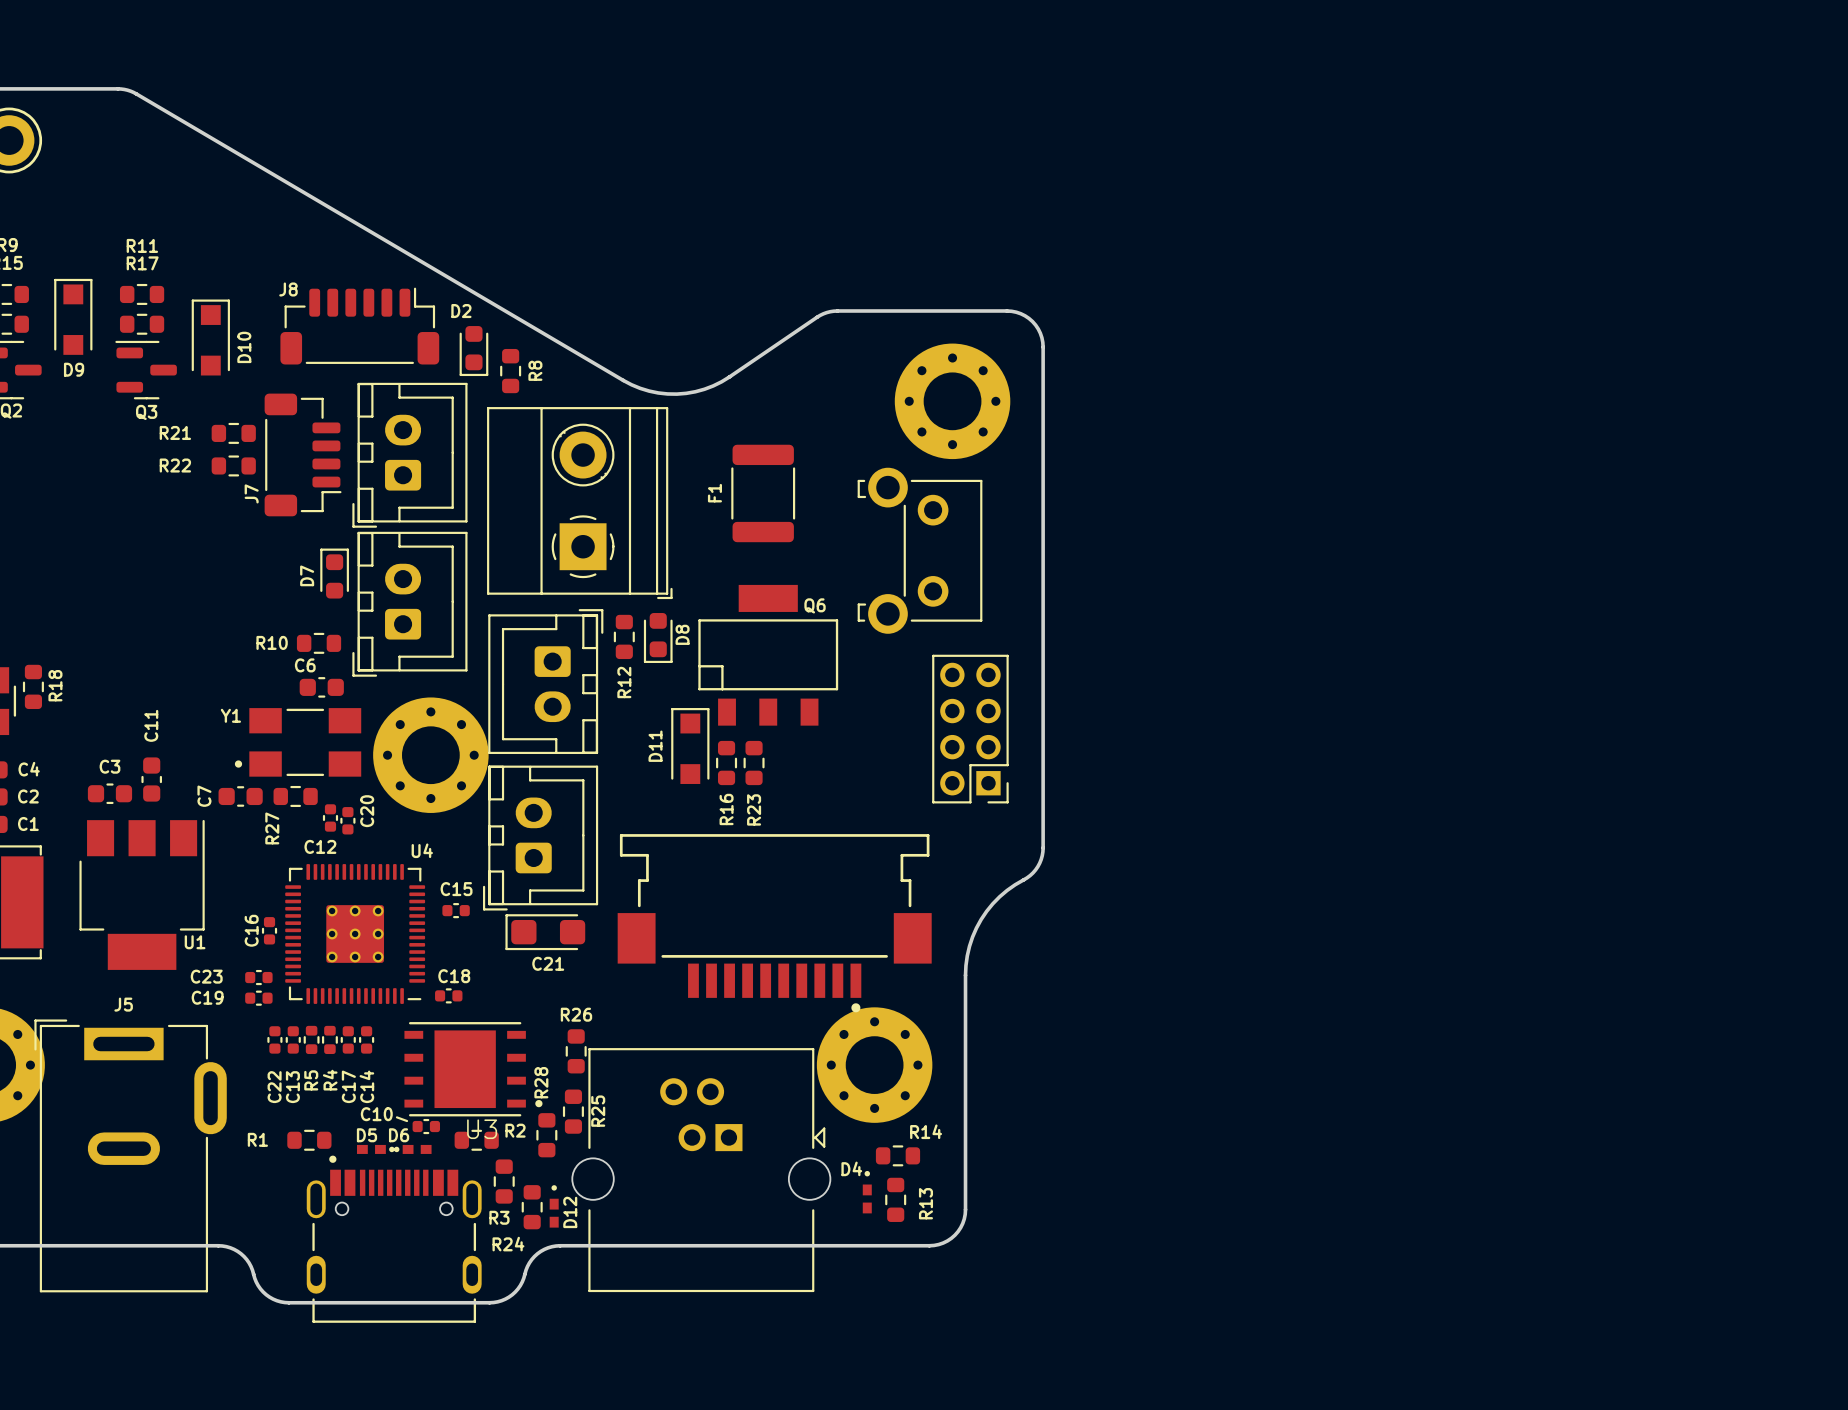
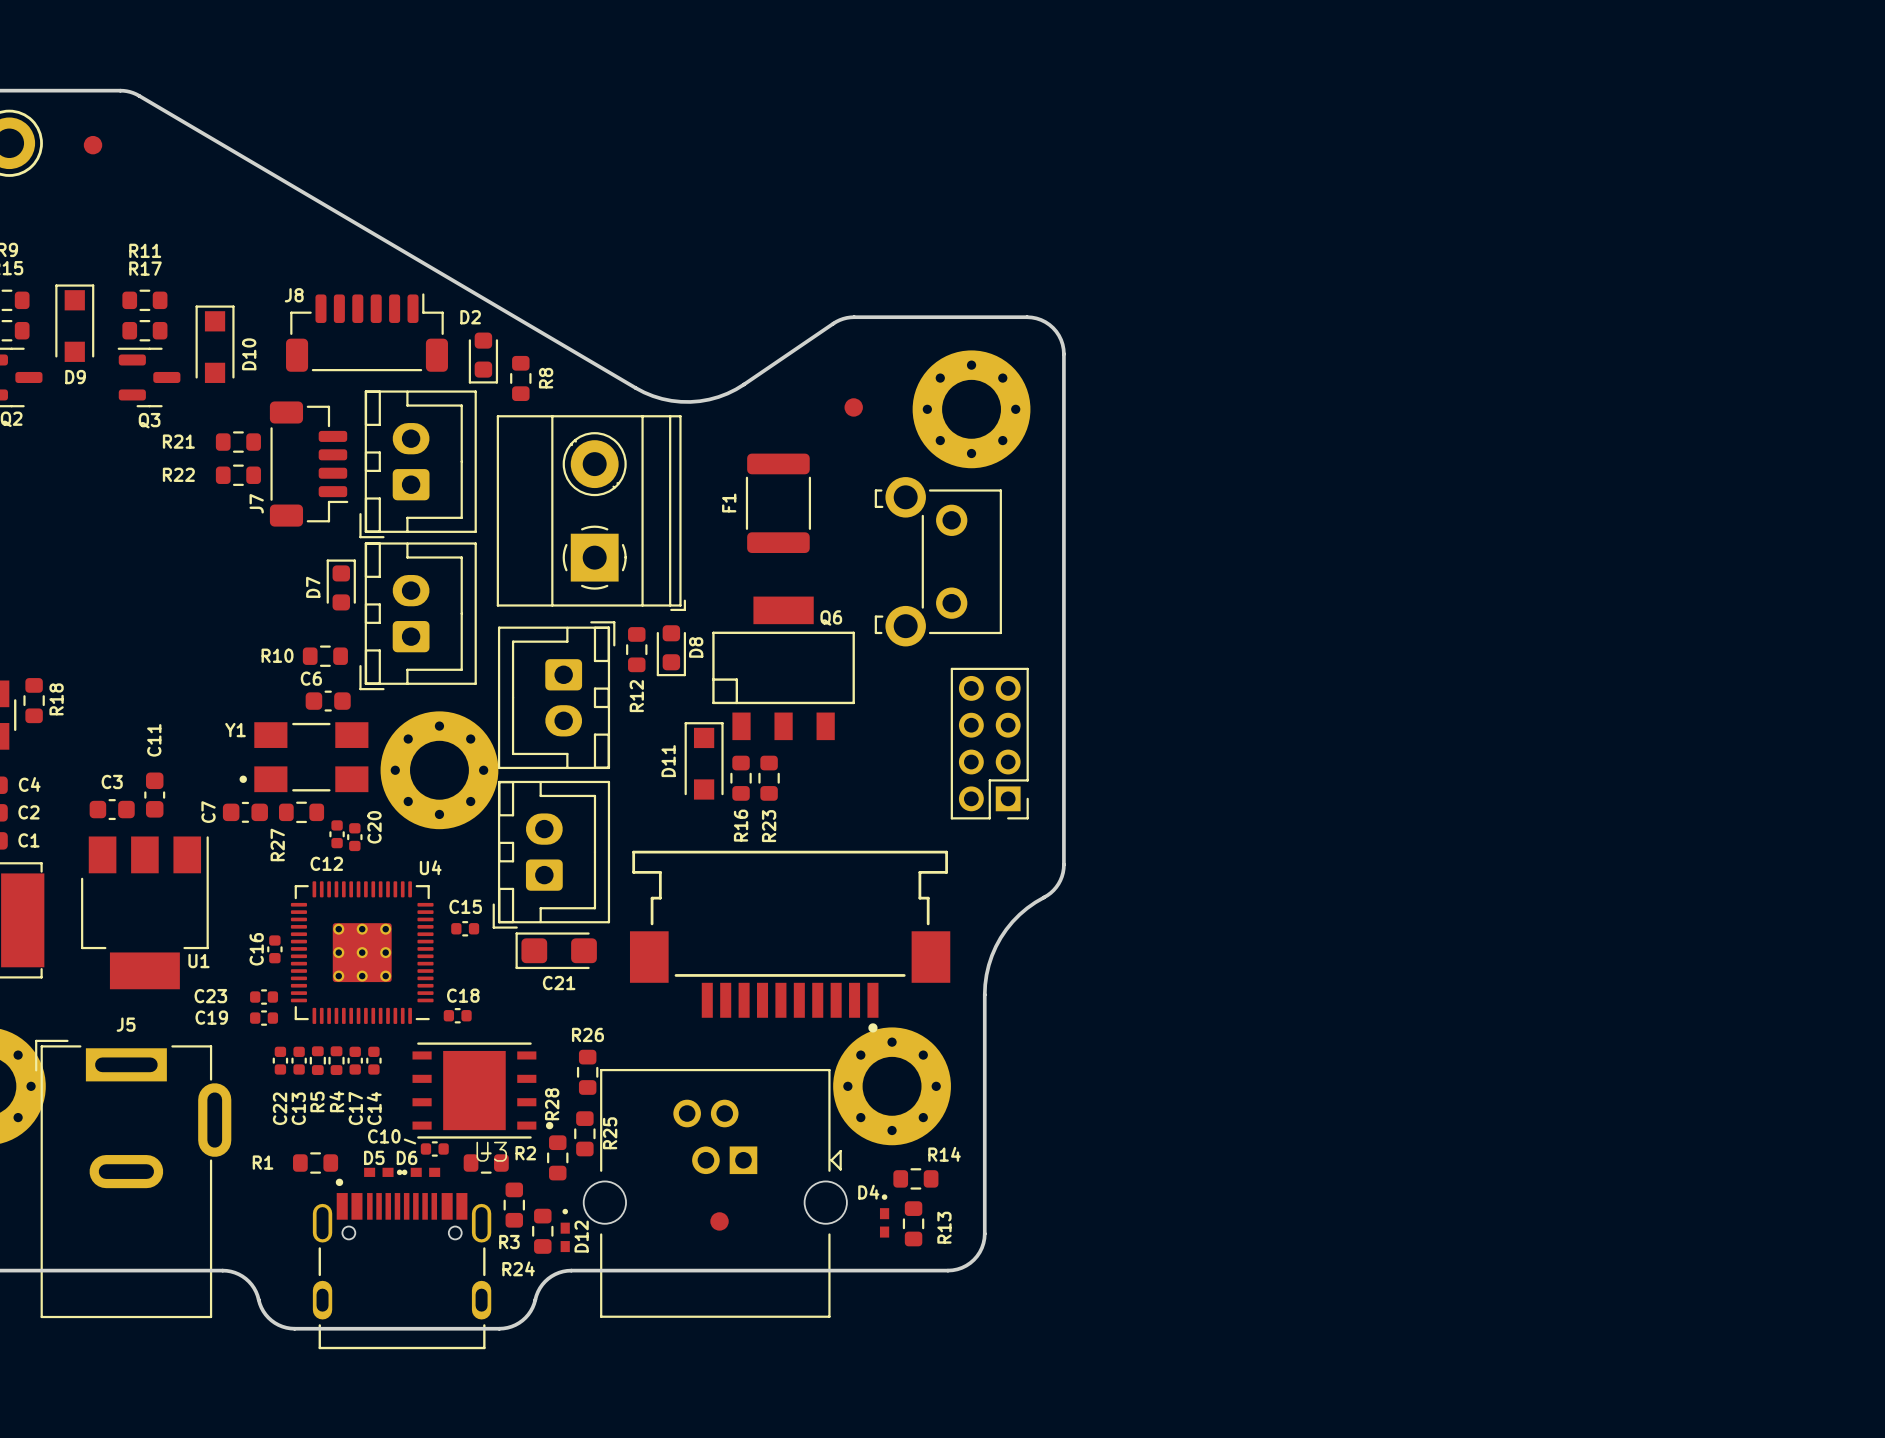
part: none -> (93, 145)
part: none -> (853, 407)
part: none -> (719, 1221)

